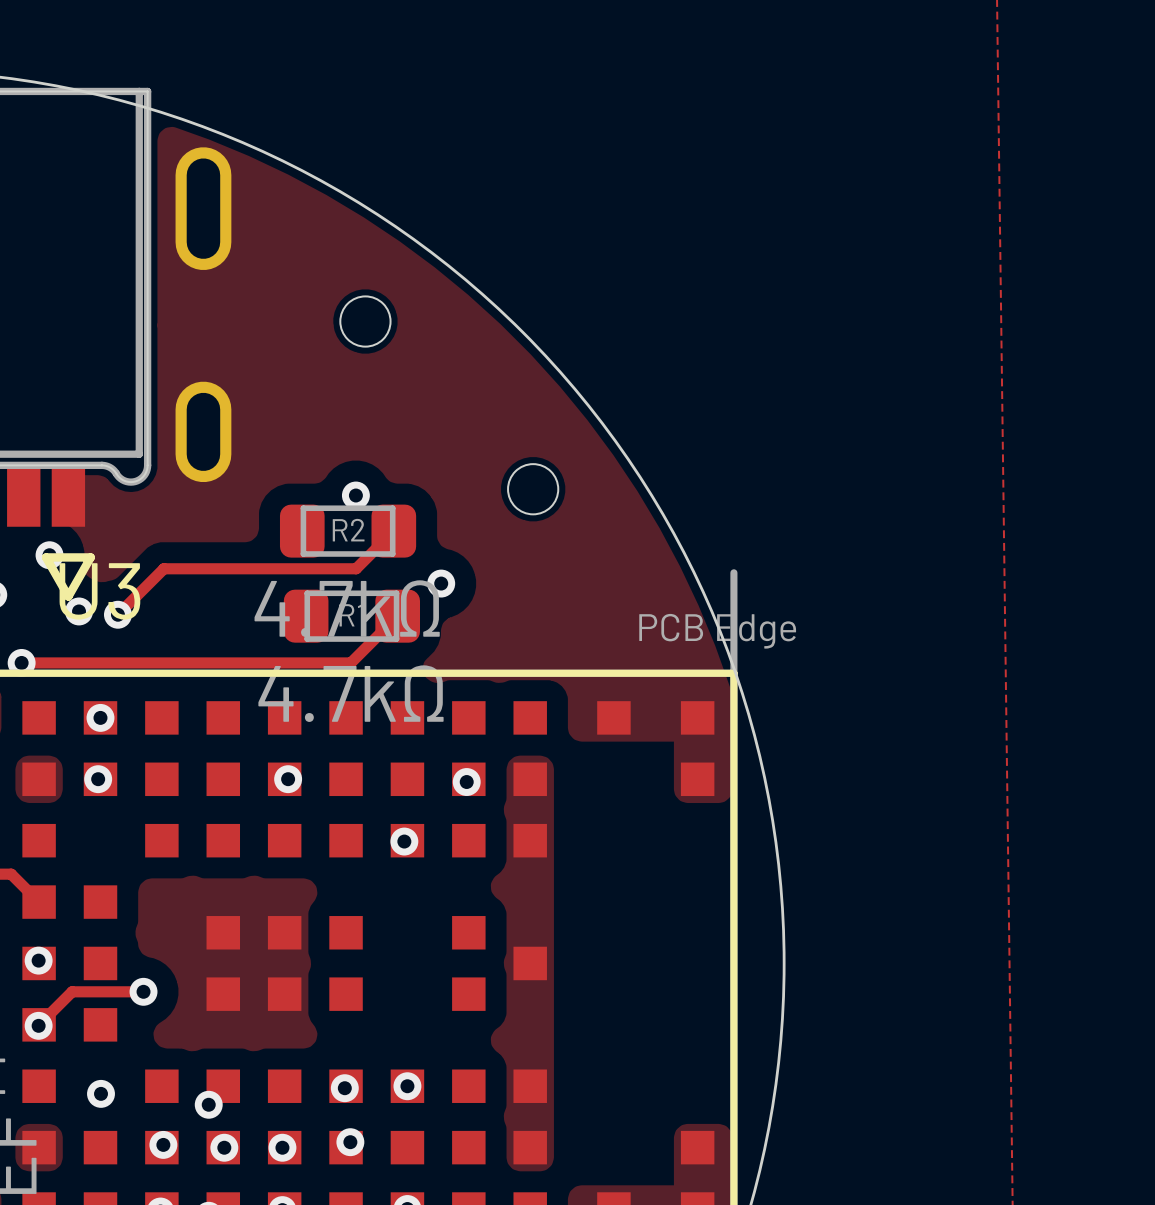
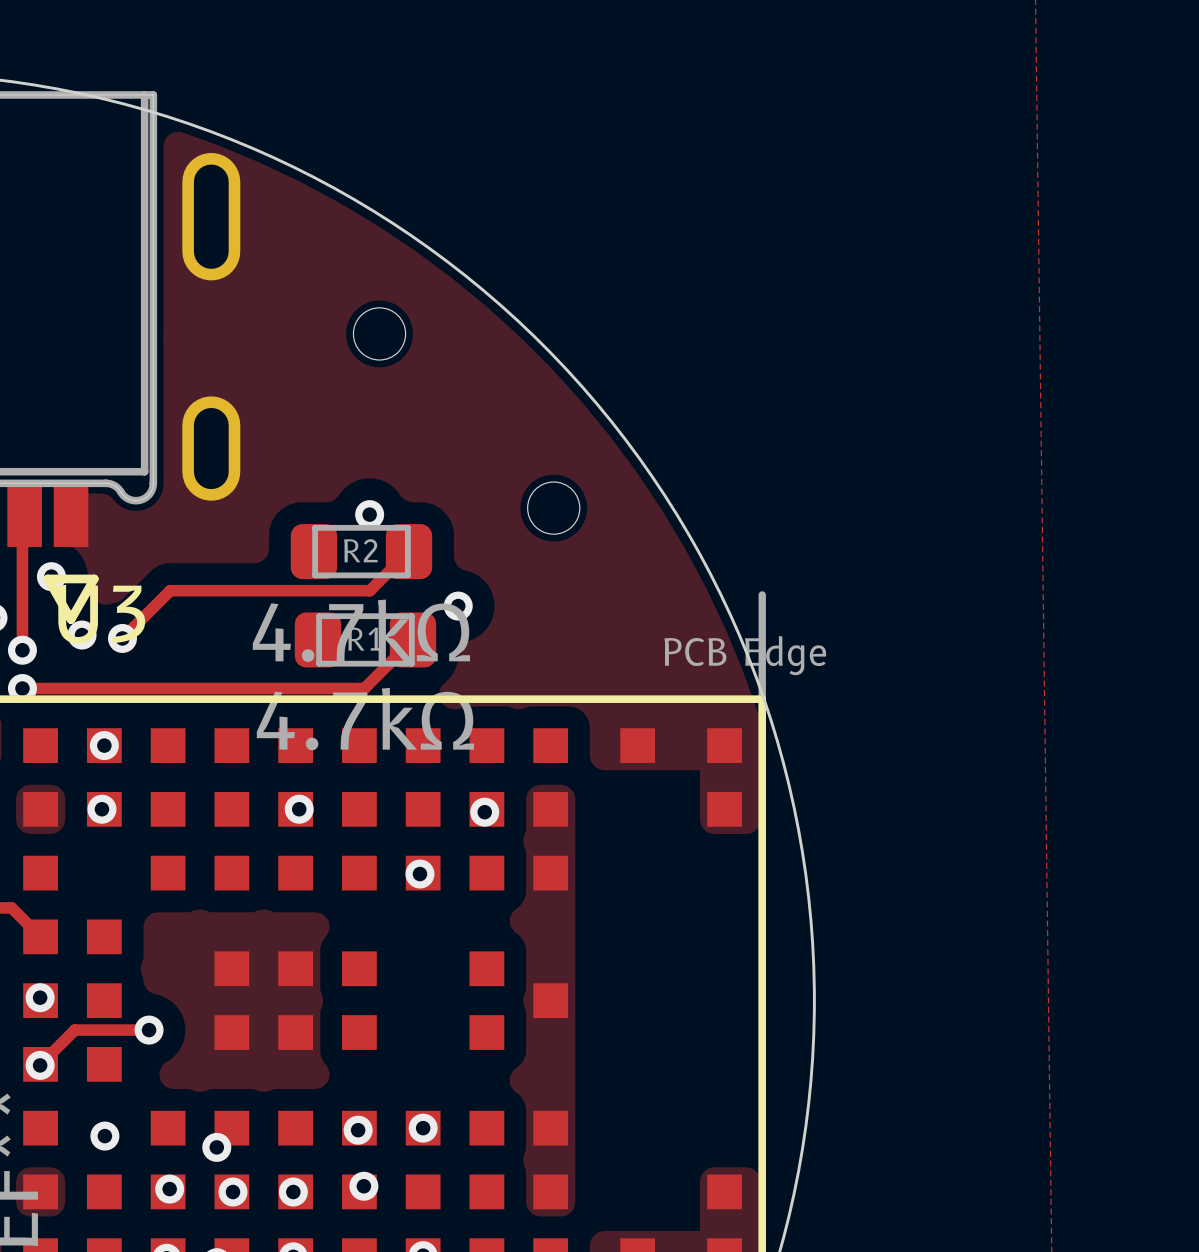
track: none -> (24, 515) (22, 517) (22, 650)
via: none -> (22, 650)

